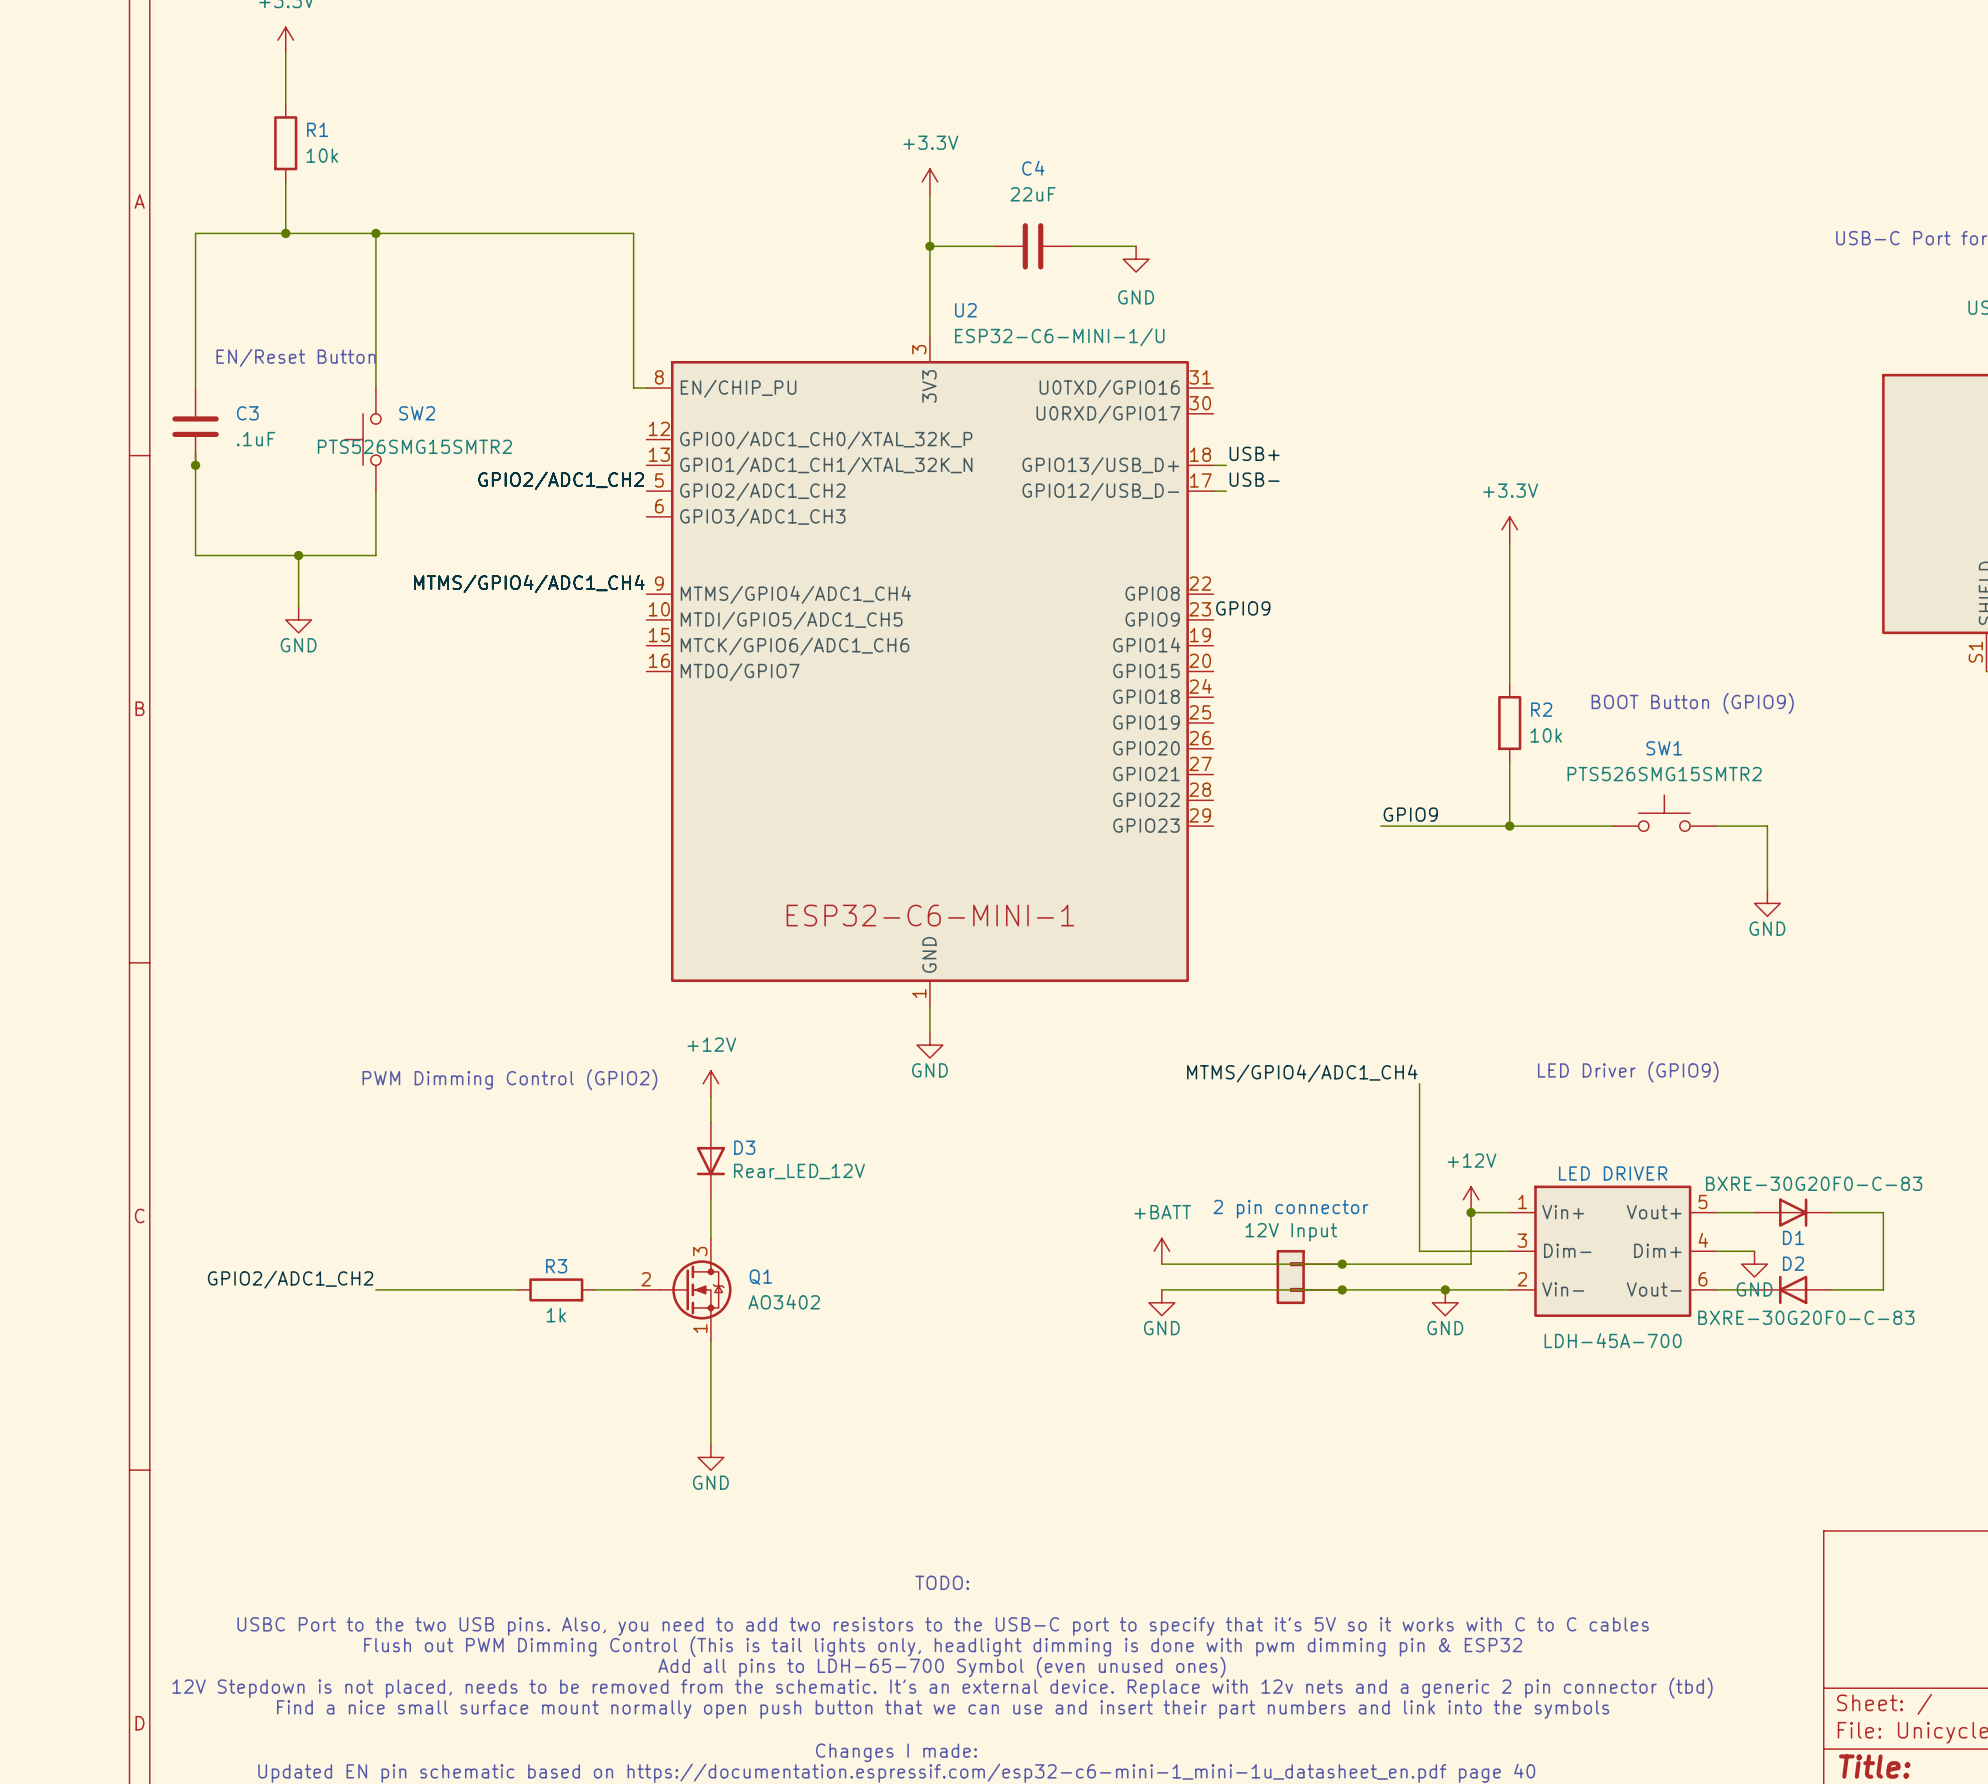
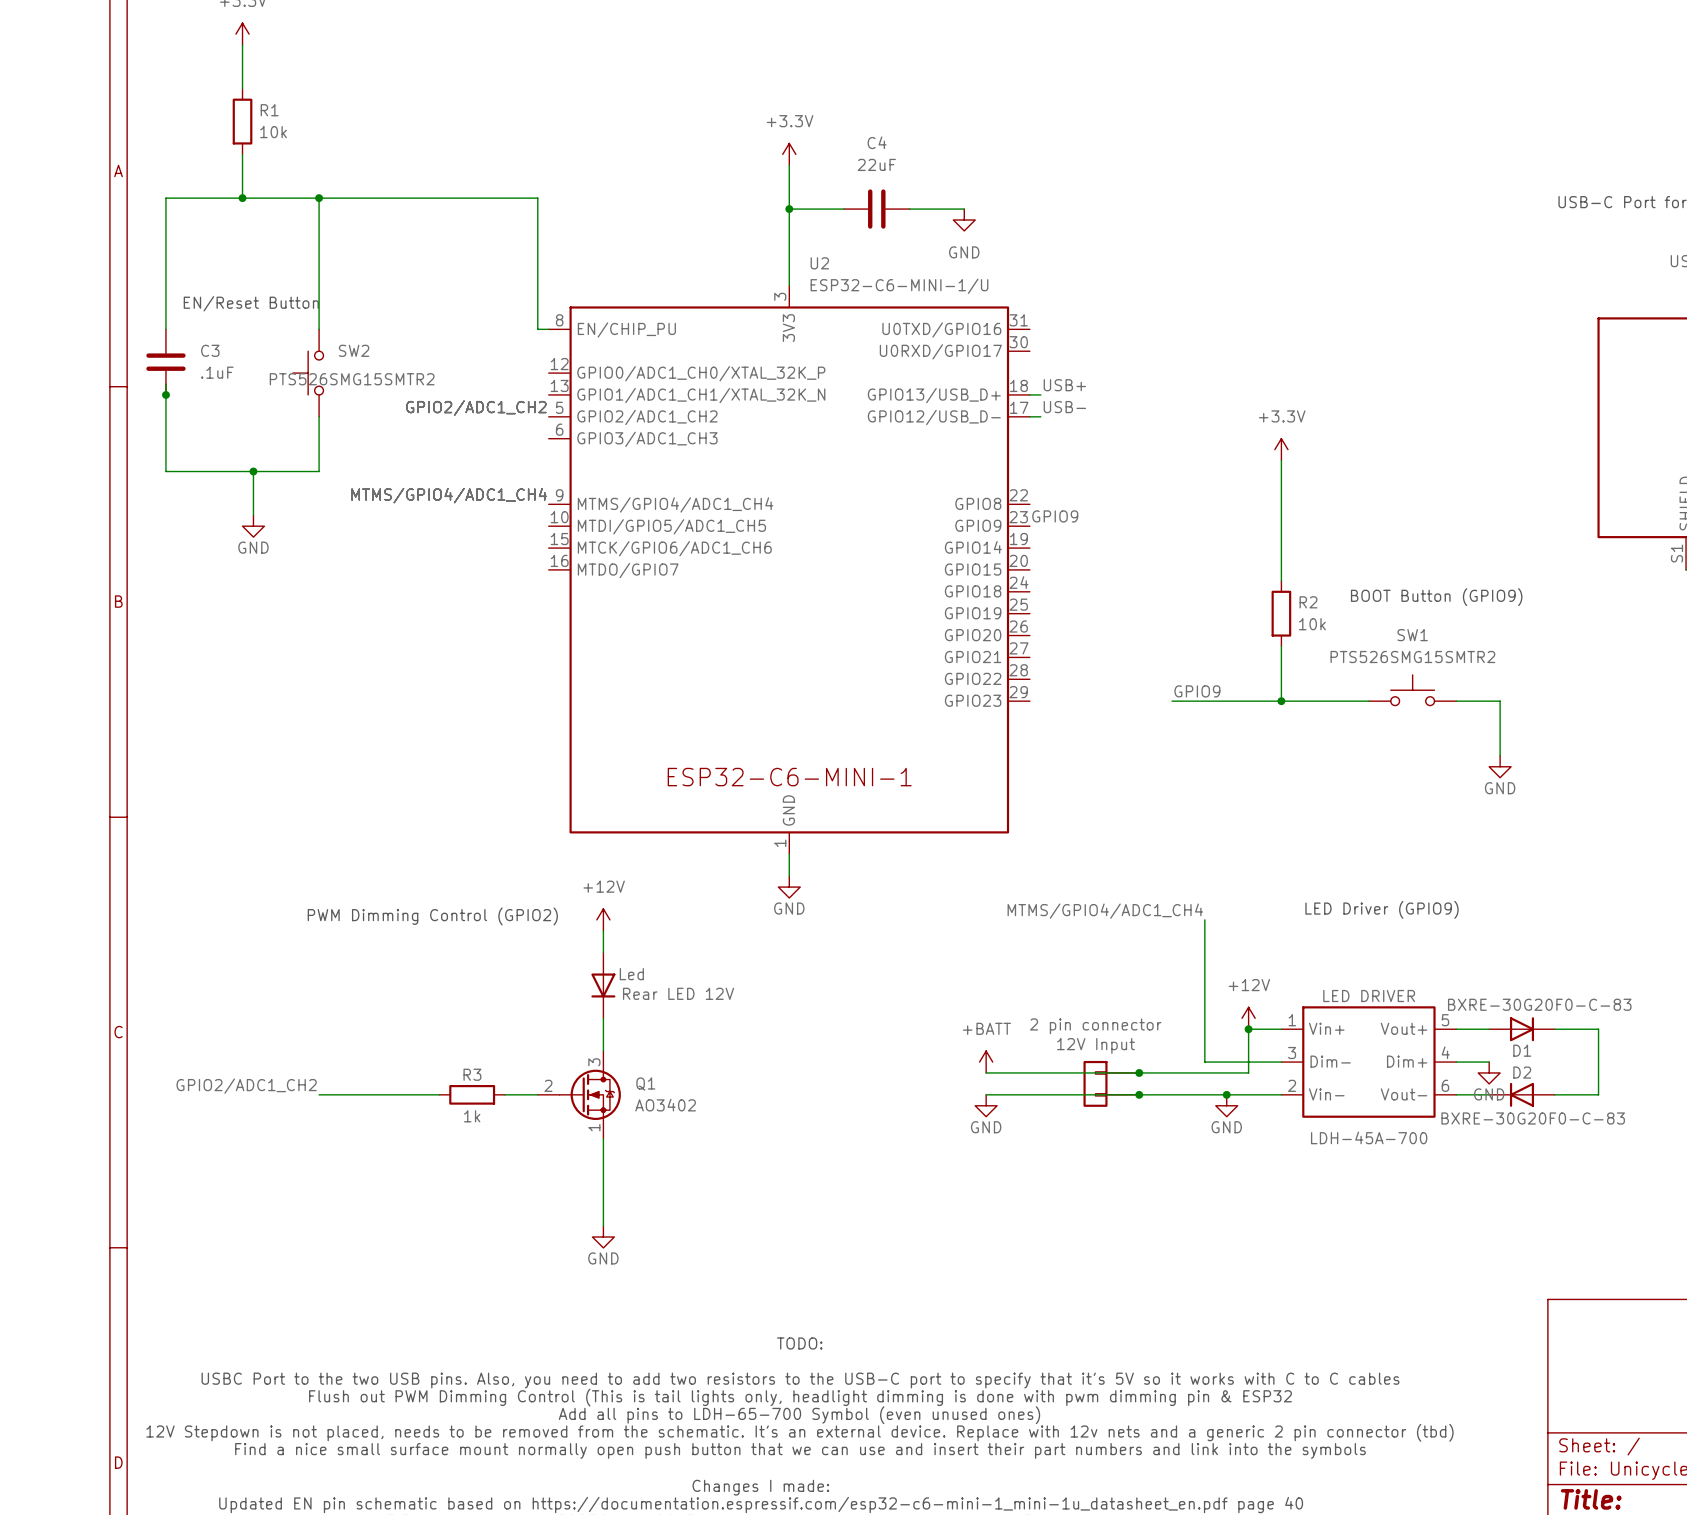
D3 name: D3 (744, 1147) -> Led (631, 974)
D3 value: Rear_LED_12V (799, 1171) -> Rear LED 12V (678, 993)

